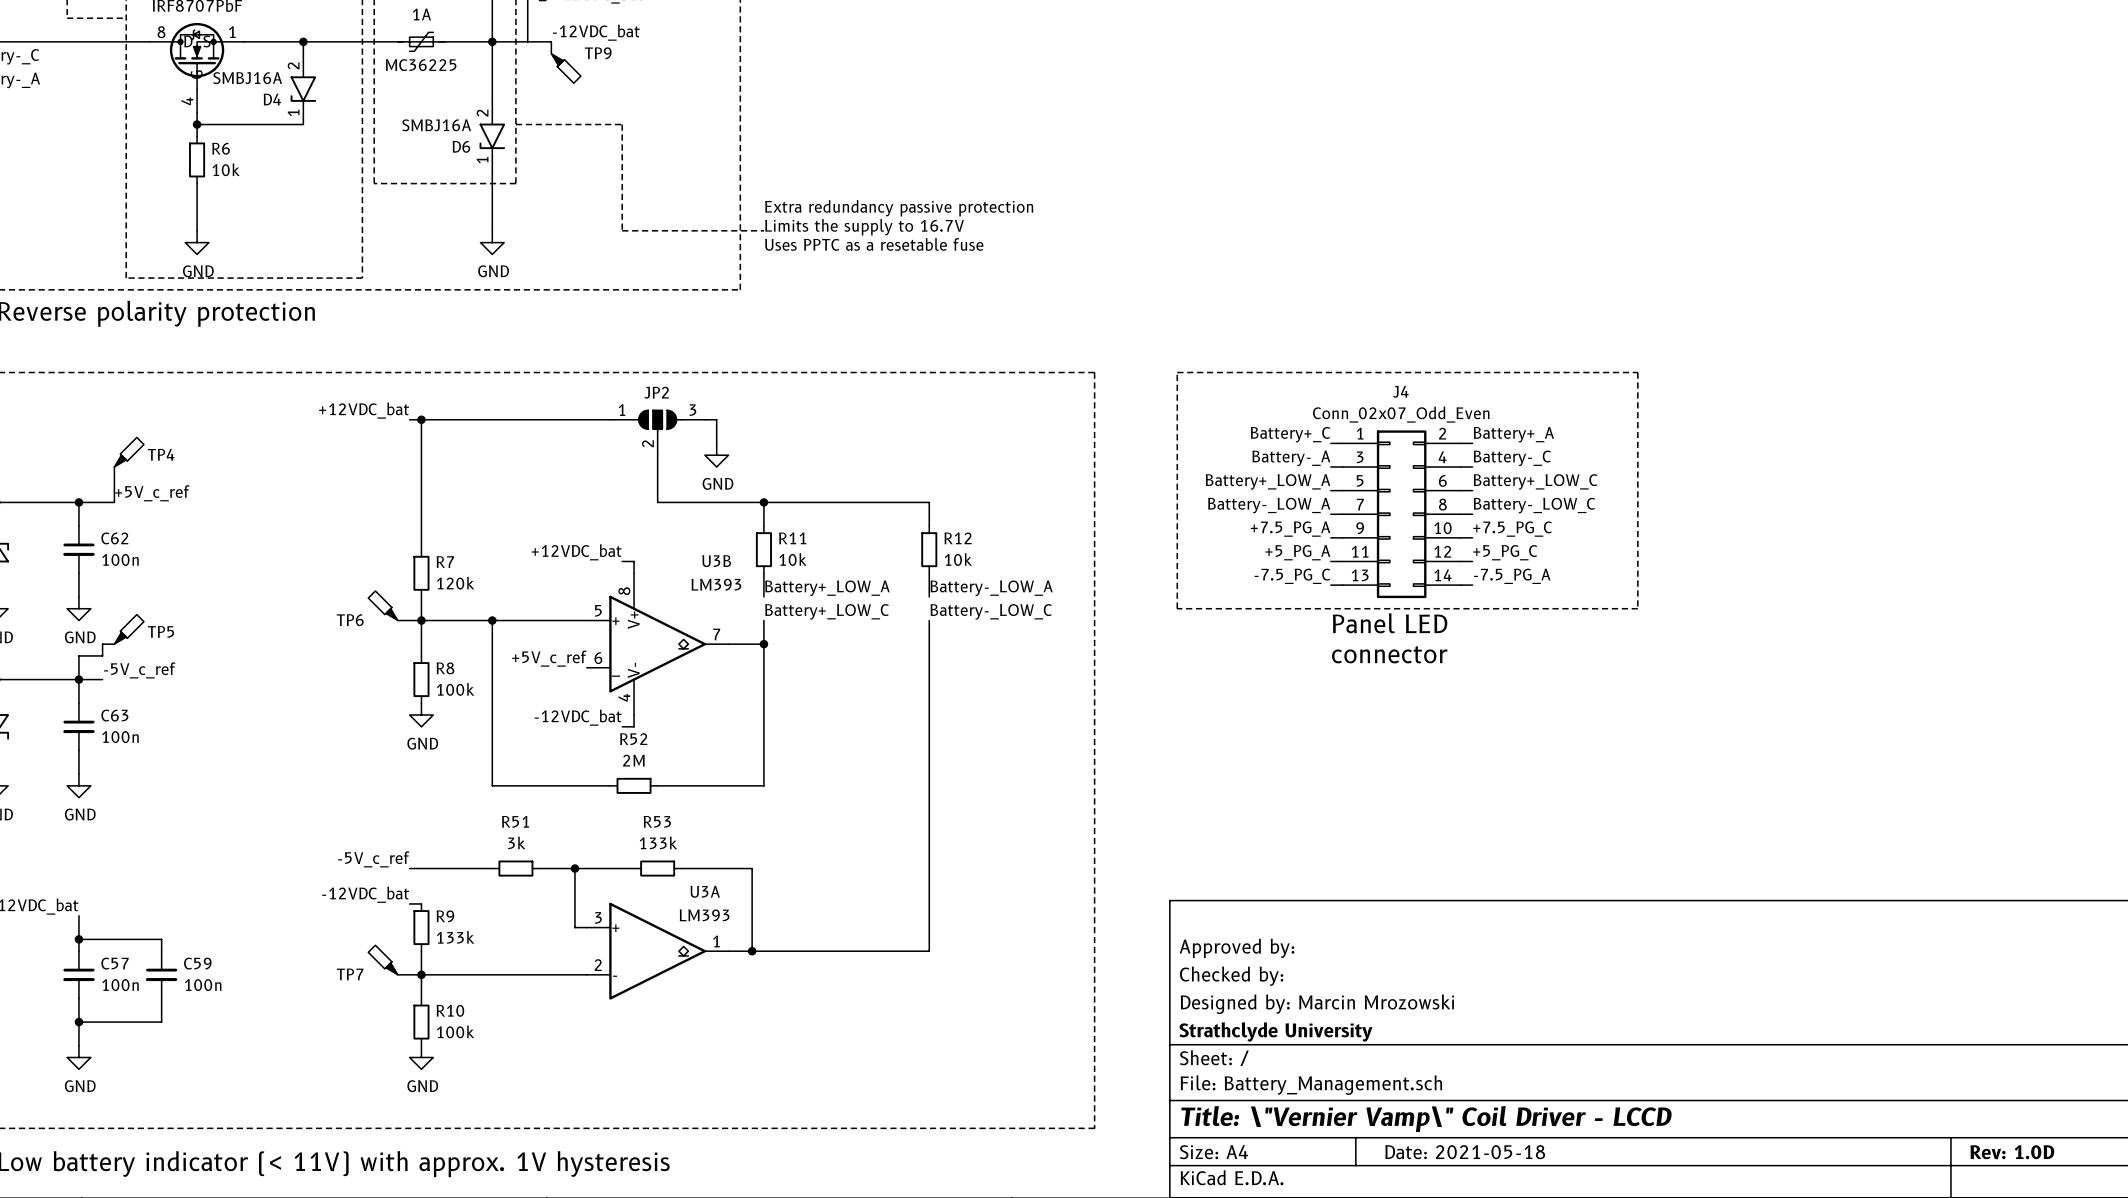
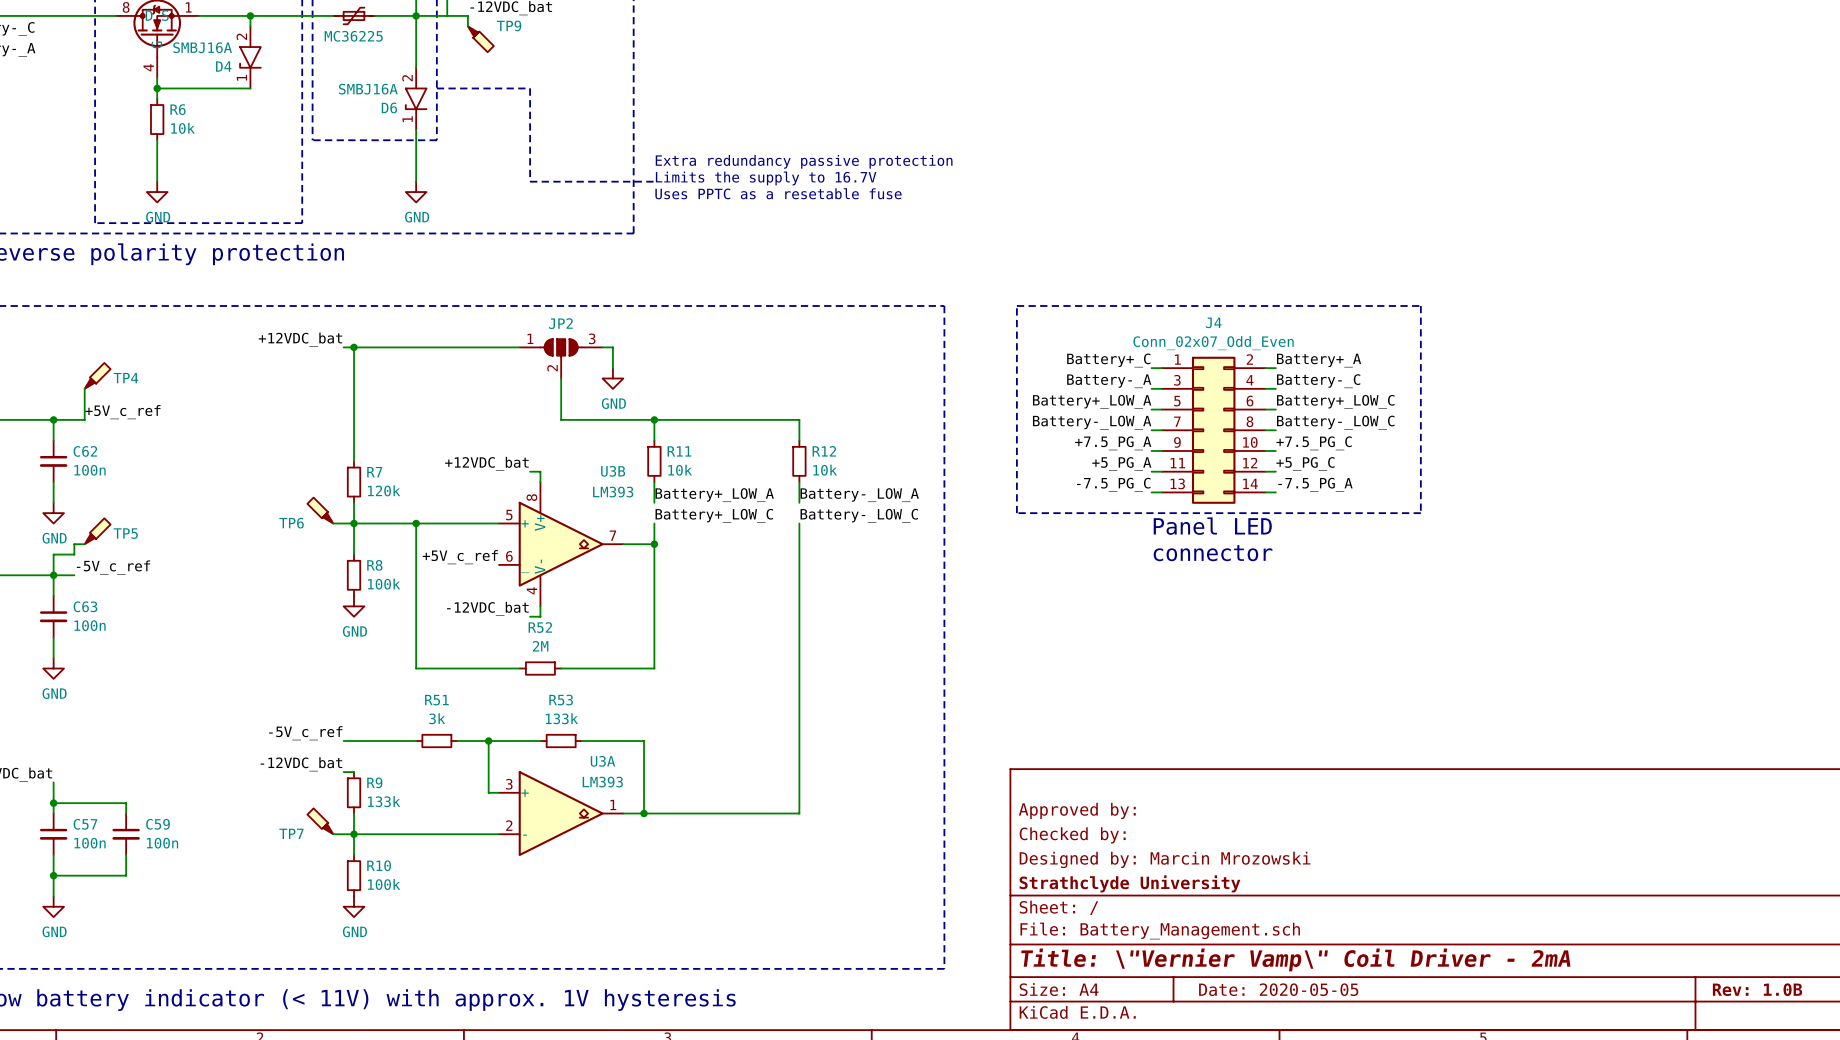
title block: Title: \"Vernier Vamp\" Coil Driver - LCCD (1426, 1118) -> Title: \"Vernier Vamp\" Coil Driver - 2mA (1295, 959)
title block: Date: 2021-05-18 (1465, 1152) -> Date: 2020-05-05 (1278, 989)
title block: Rev: 1.0D (2012, 1152) -> Rev: 1.0B (1757, 989)

